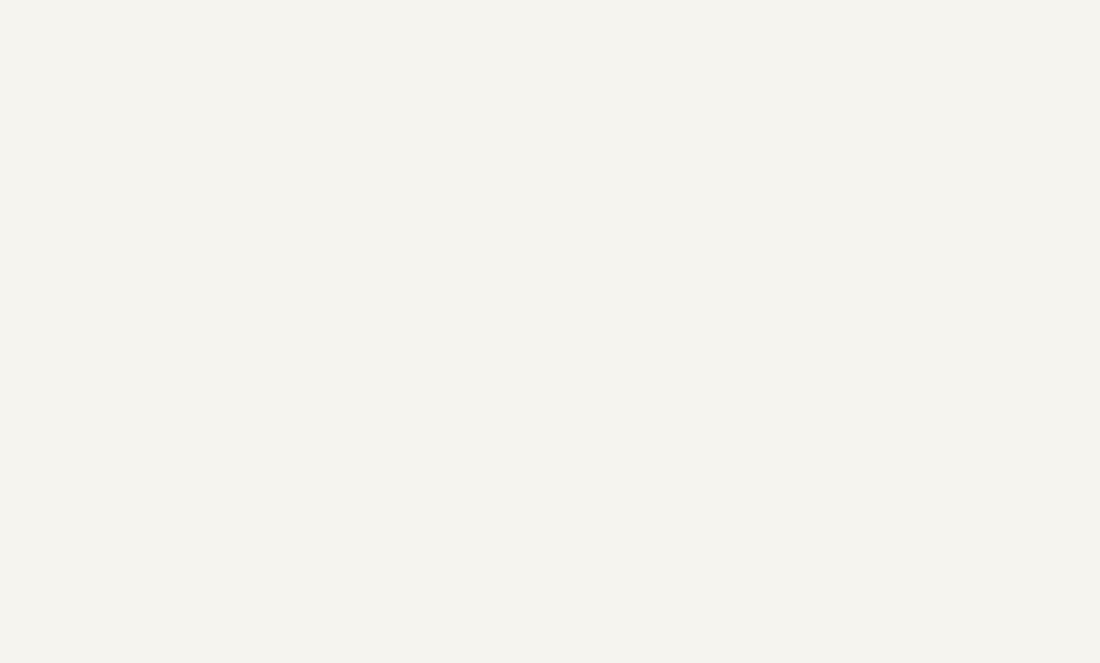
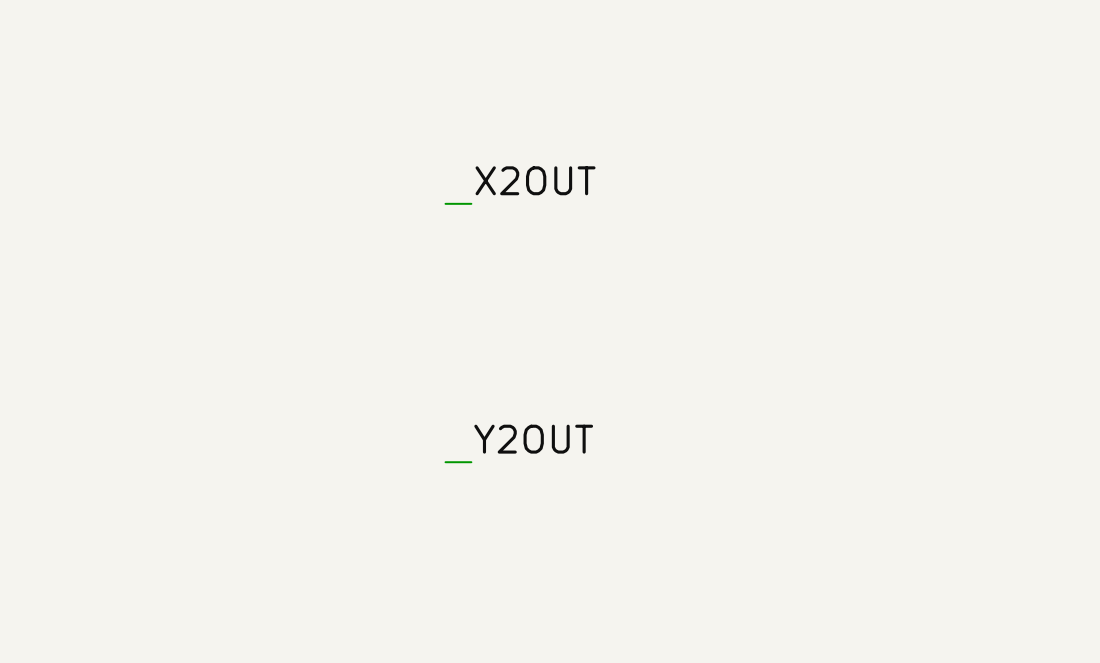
label: none -> X2OUT (535, 180)
wire: none -> (445, 203) (471, 203)
label: none -> Y2OUT (533, 439)
wire: none -> (445, 462) (471, 462)

